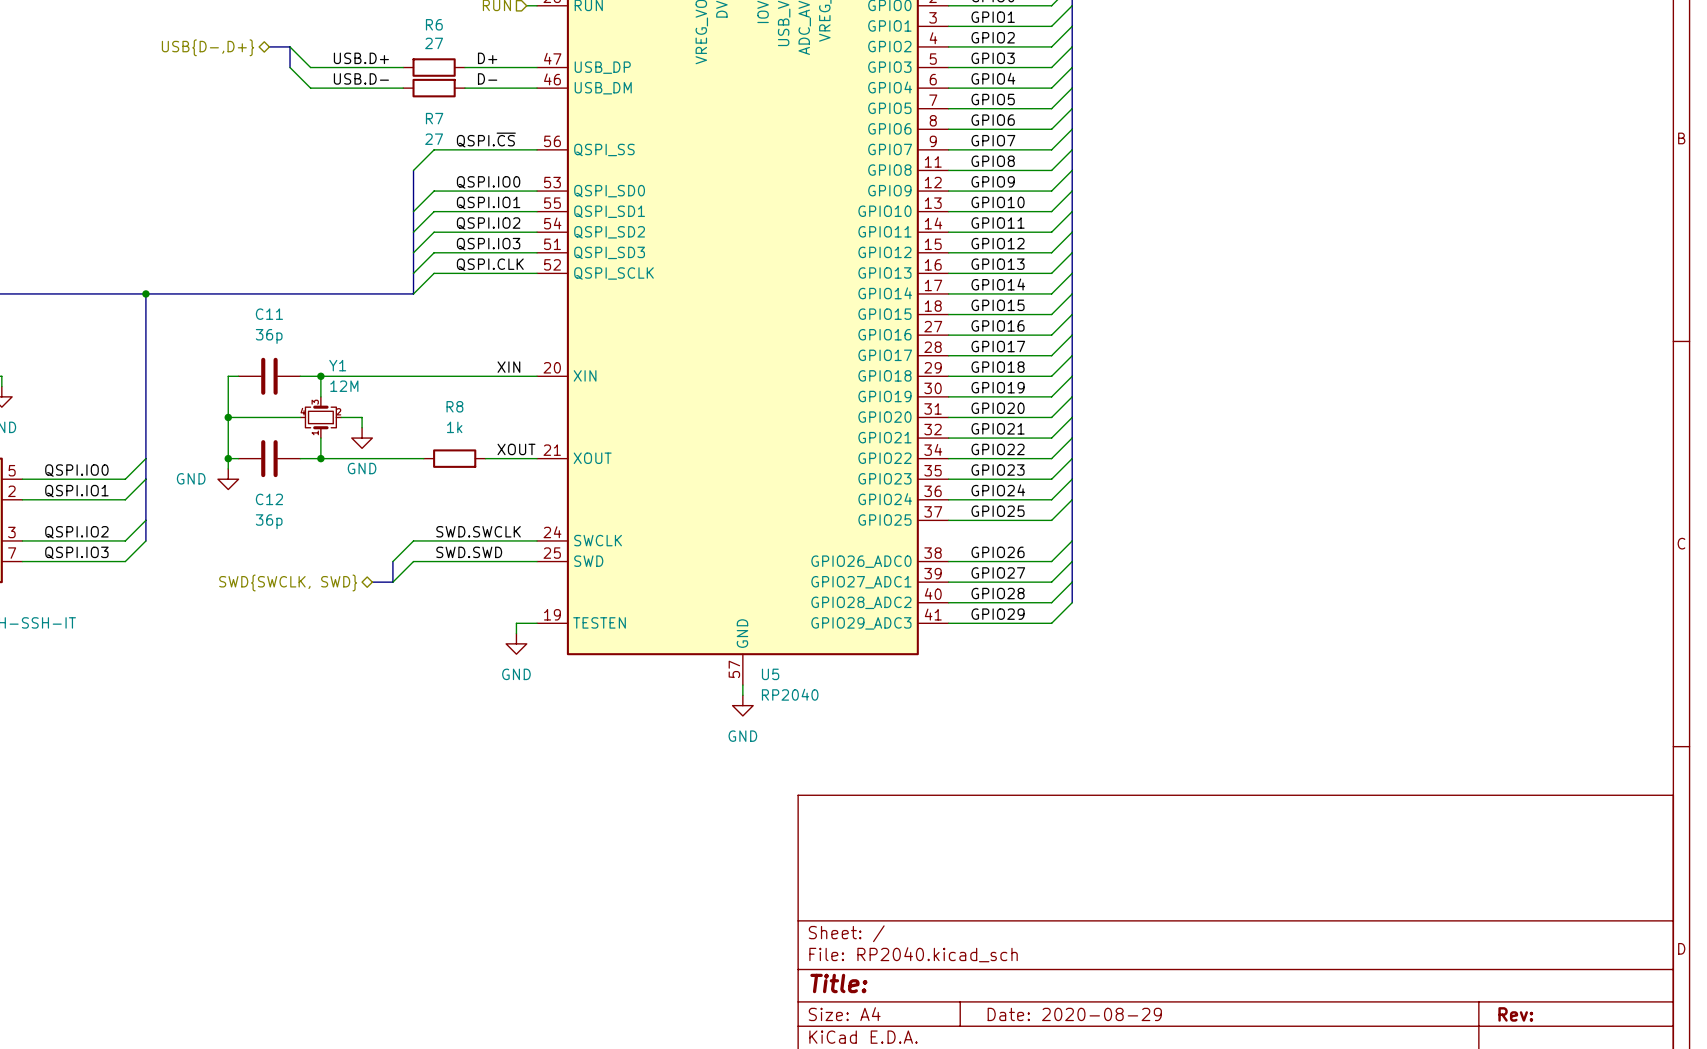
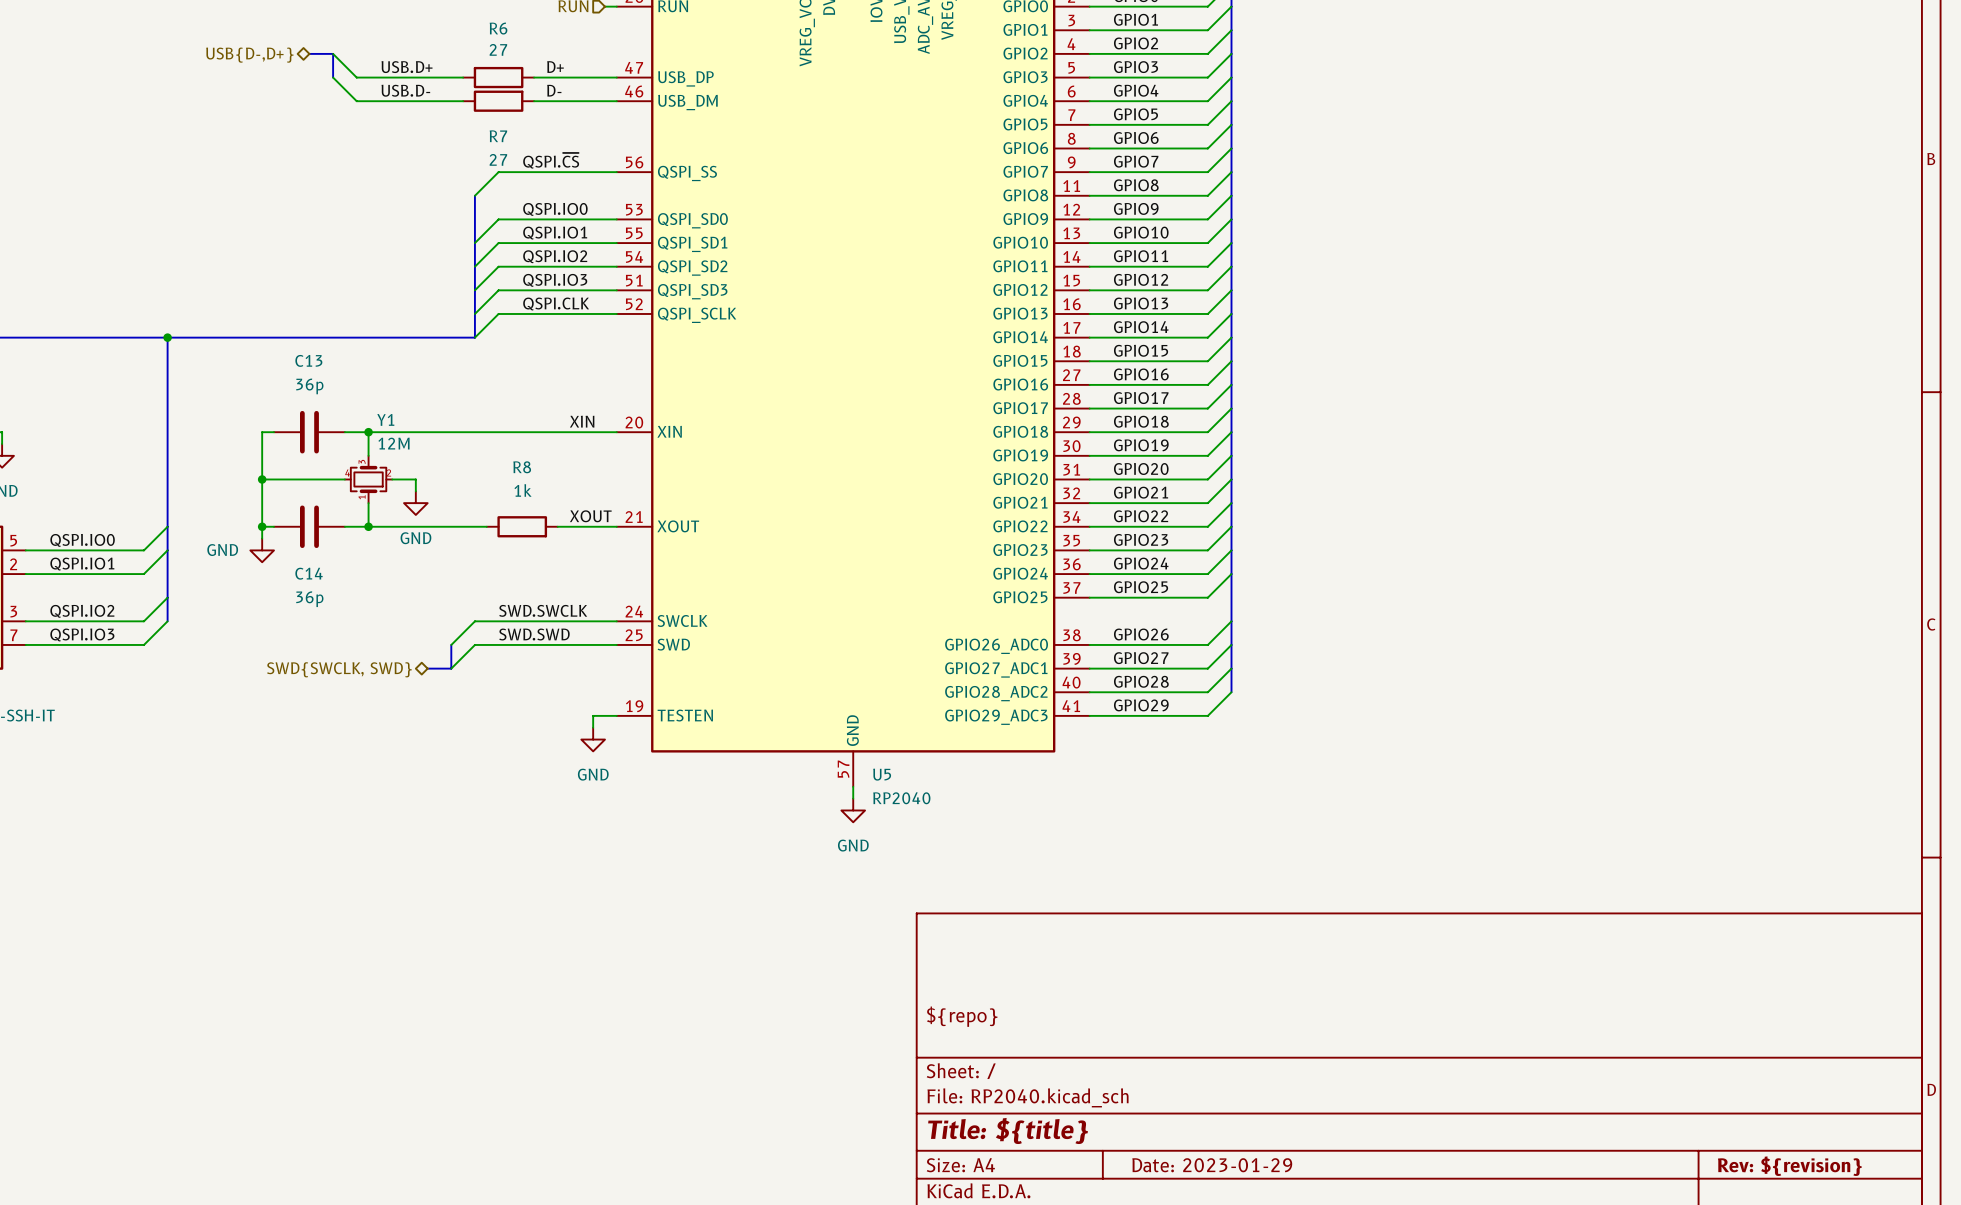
C11 name: C11 (269, 314) -> C13 (308, 360)
C12 name: C12 (269, 499) -> C14 (309, 573)
title block: none -> ${repo} (962, 1016)
title block: Title: (838, 983) -> Title: ${title} (1008, 1130)
title block: Date: 2020-08-29 (1074, 1014) -> Date: 2023-01-29 (1212, 1165)
title block: Rev: (1515, 1014) -> Rev: ${revision} (1789, 1166)

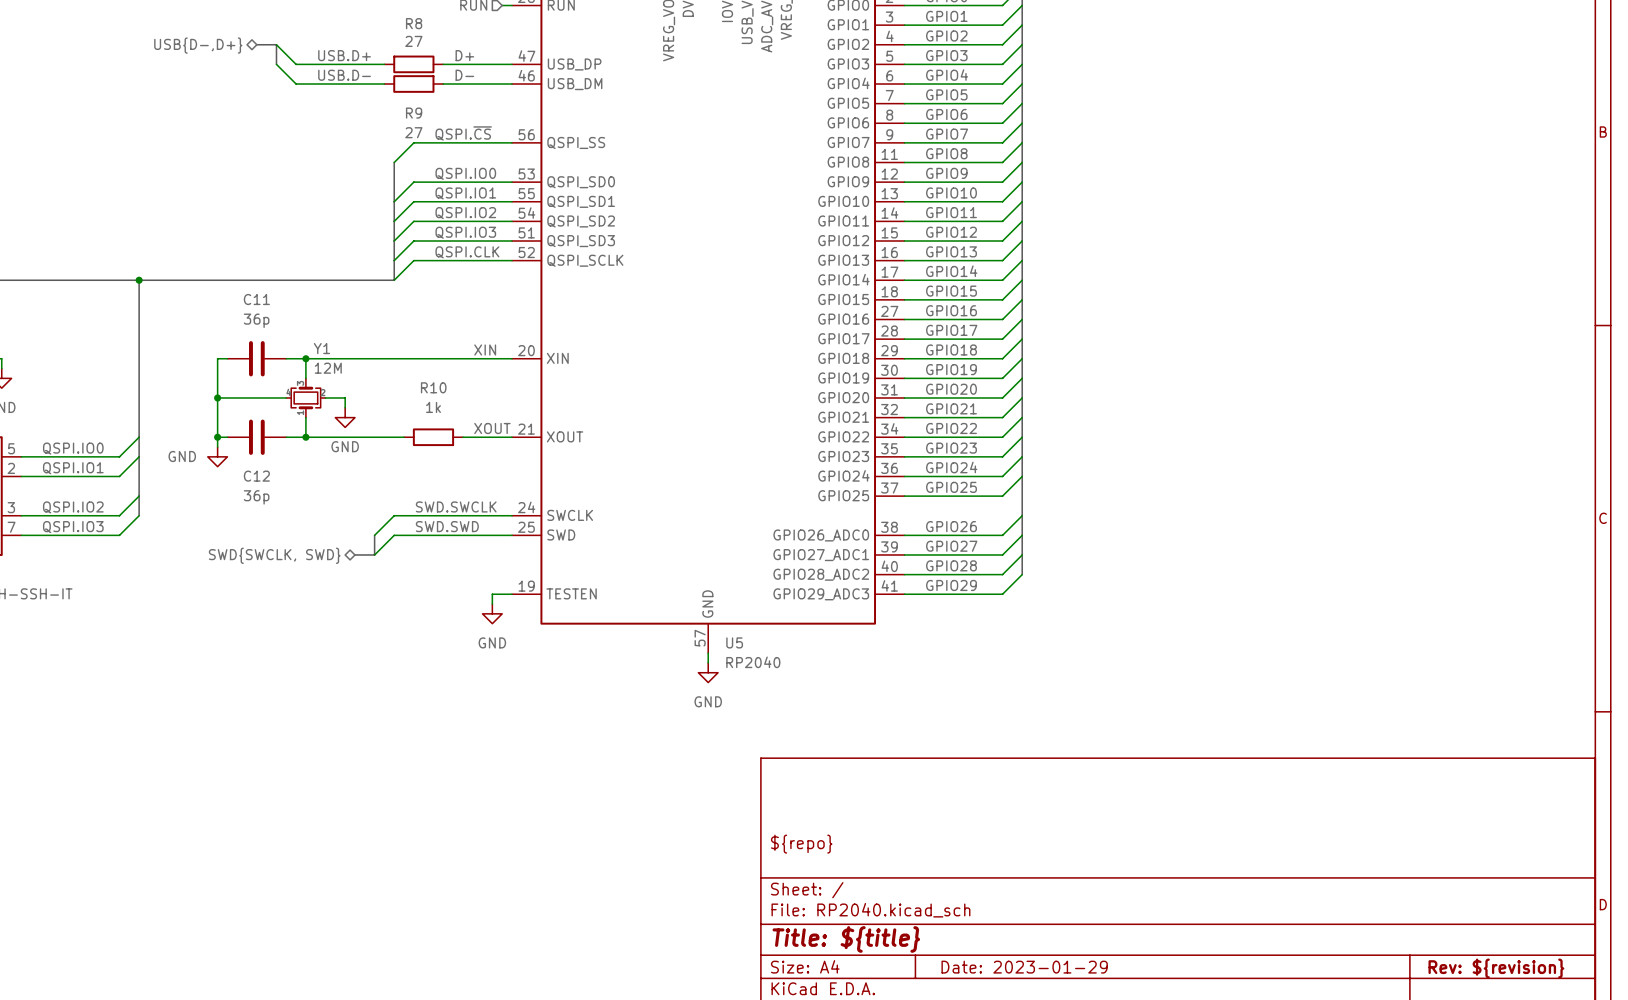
R6 name: R6 (498, 28) -> R8 (414, 23)
R7 name: R7 (498, 136) -> R9 (414, 113)
C13 name: C13 (308, 360) -> C11 (256, 299)
R8 name: R8 (522, 467) -> R10 (433, 387)
C14 name: C14 (309, 573) -> C12 (256, 476)

